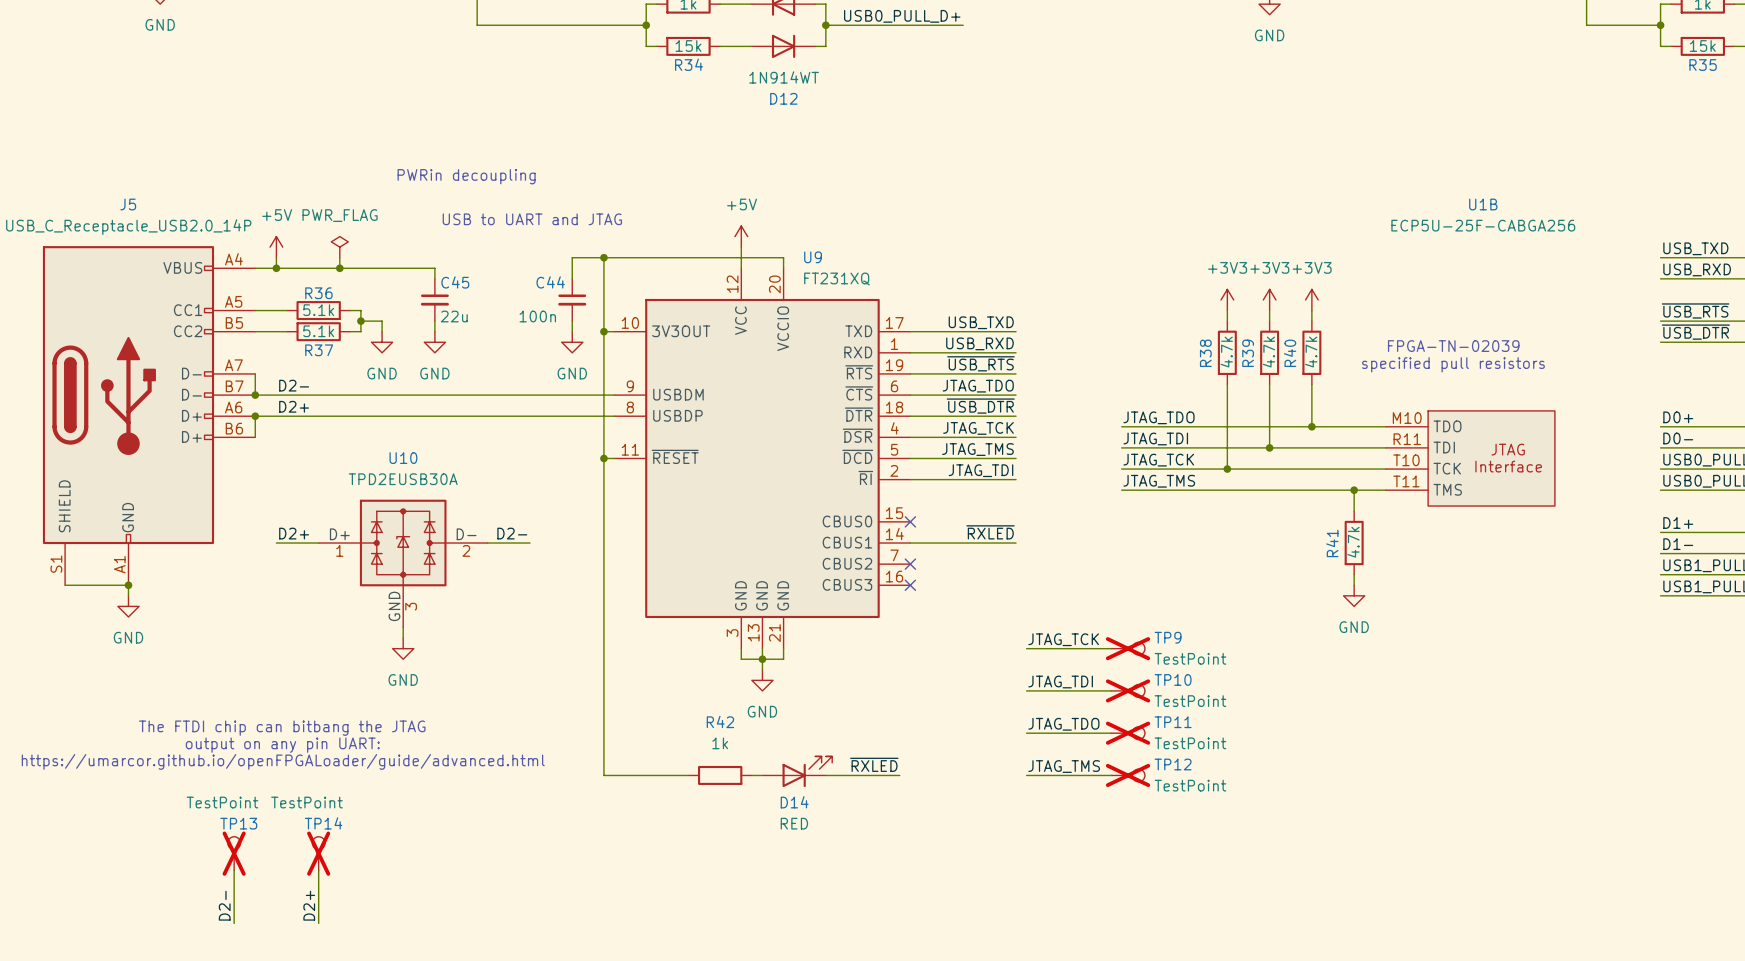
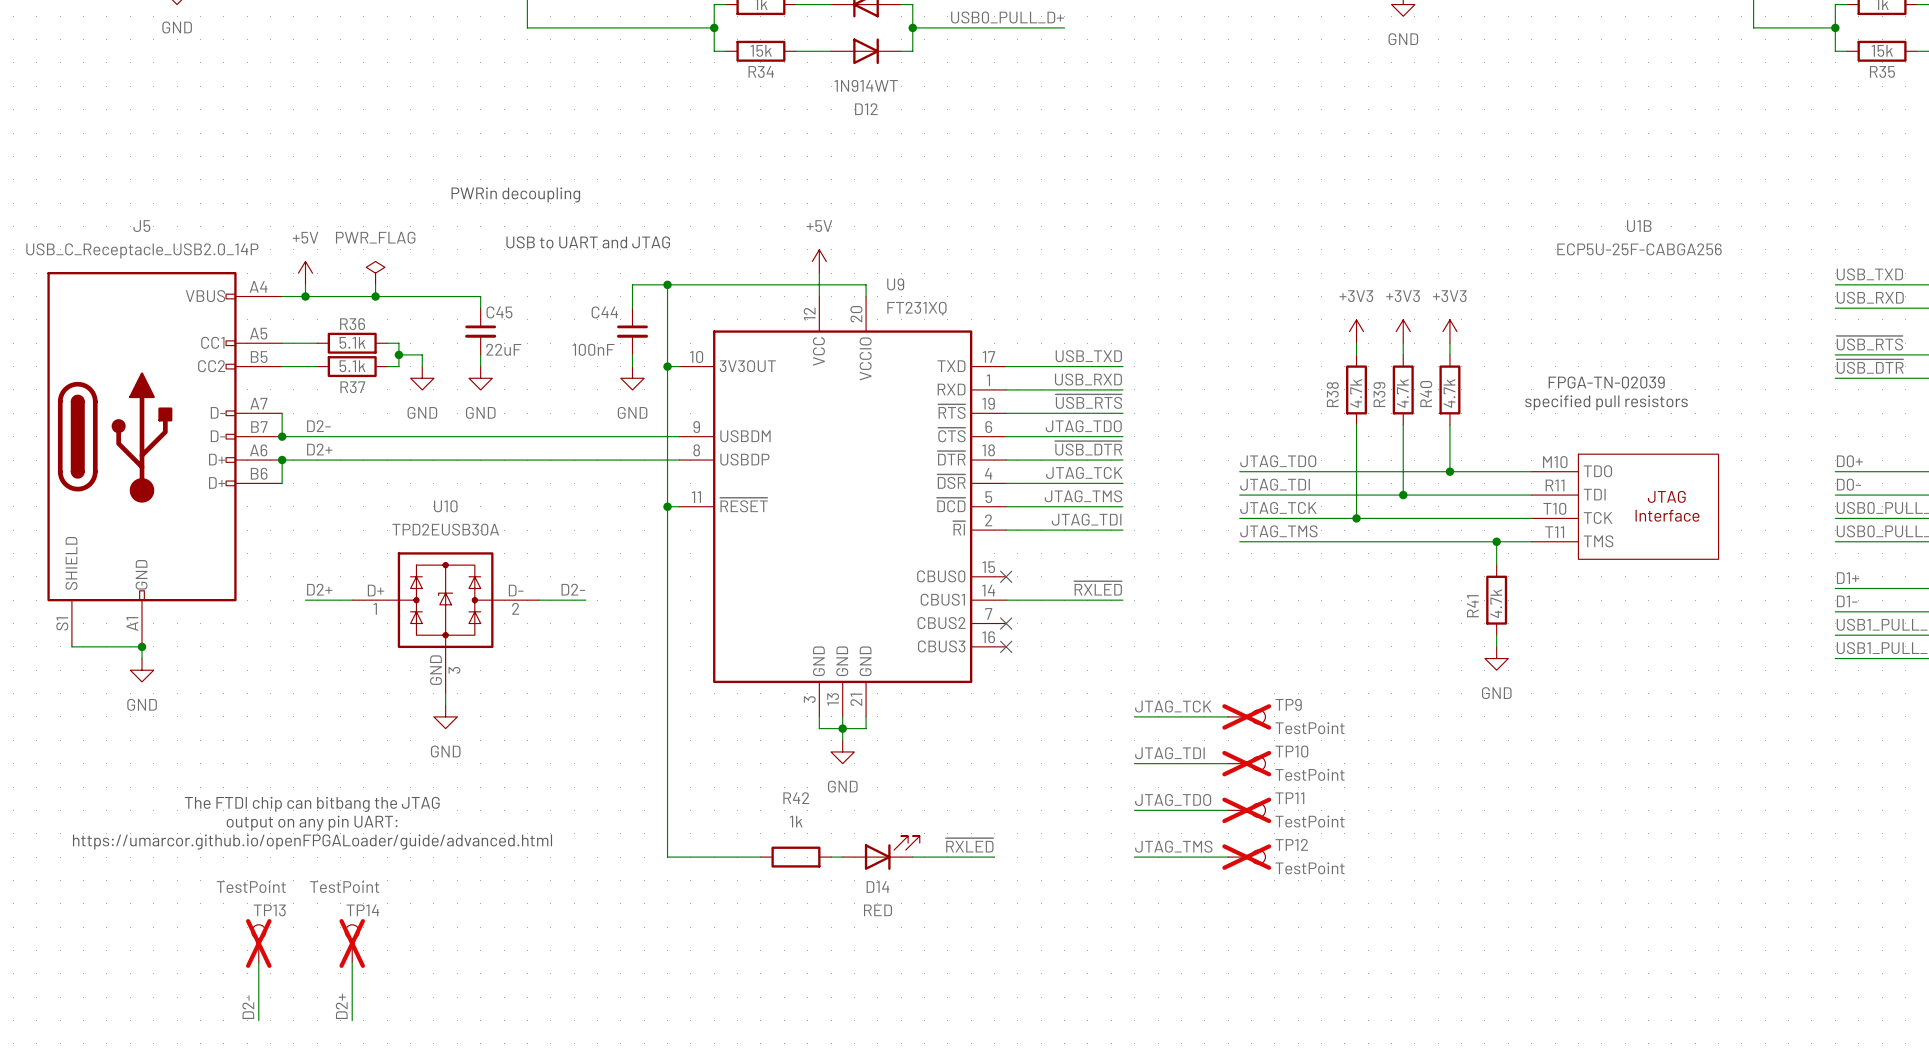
C45 value: 22u (454, 316) -> 22uF (503, 349)
C44 value: 100n (537, 316) -> 100nF (593, 349)

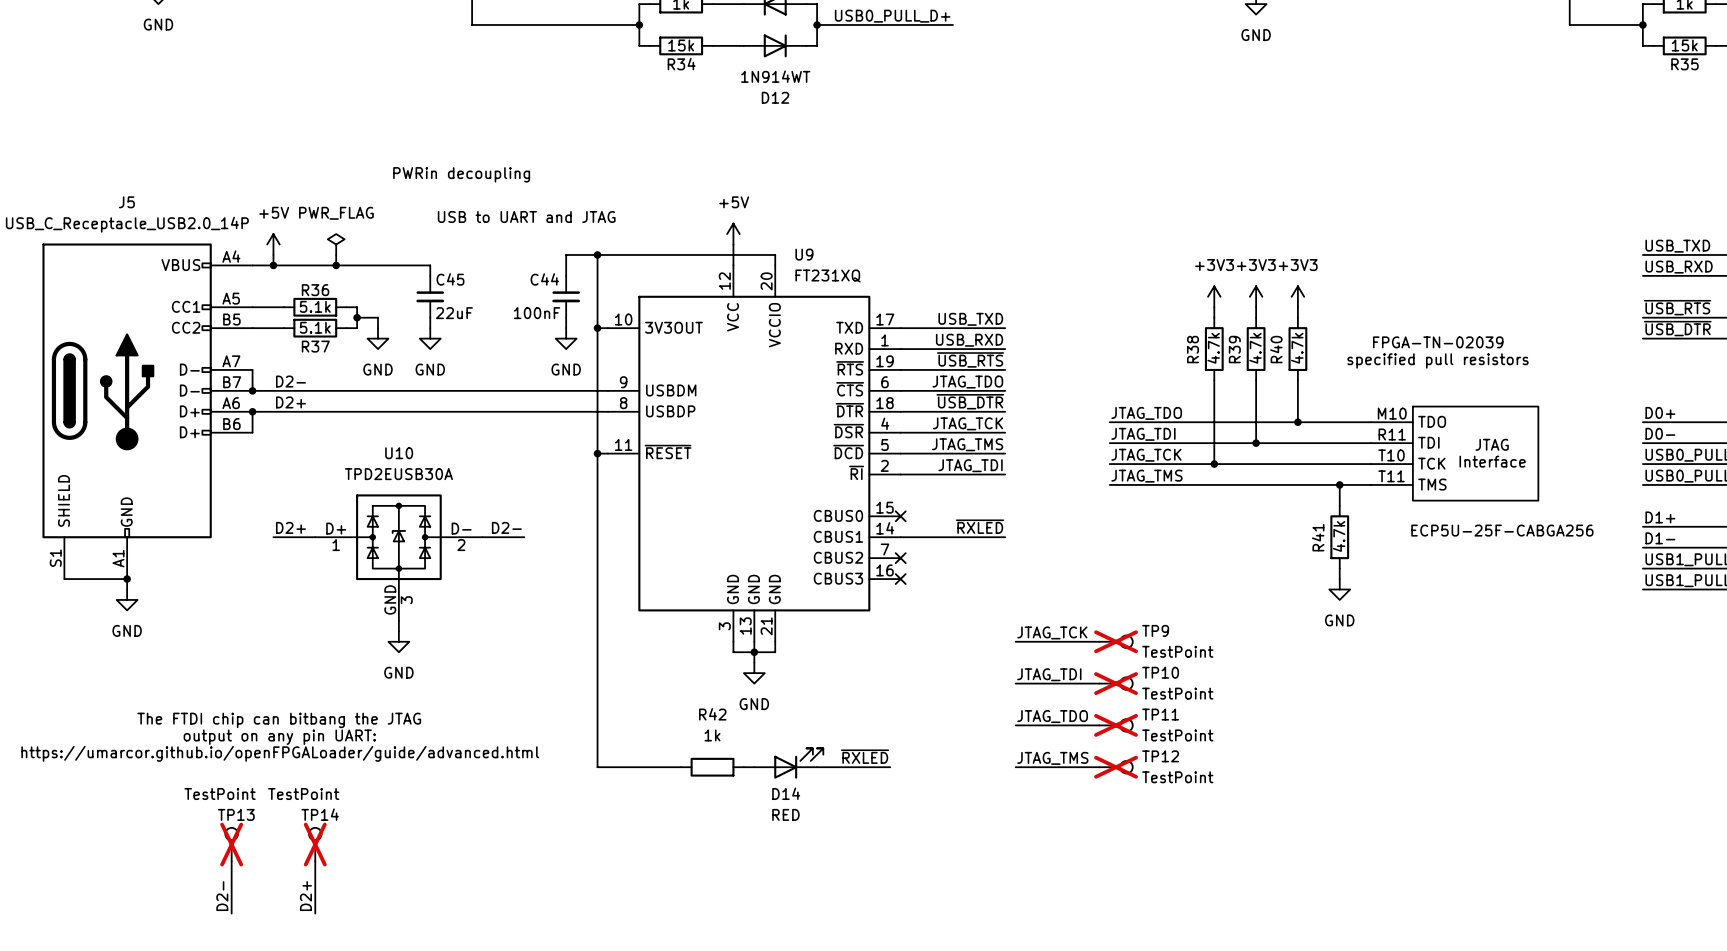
U1B name: U1B (1639, 226) -> none
U1B value position: ECP5U-25F-CABGA256 (1639, 249) -> ECP5U-25F-CABGA256 (1502, 530)

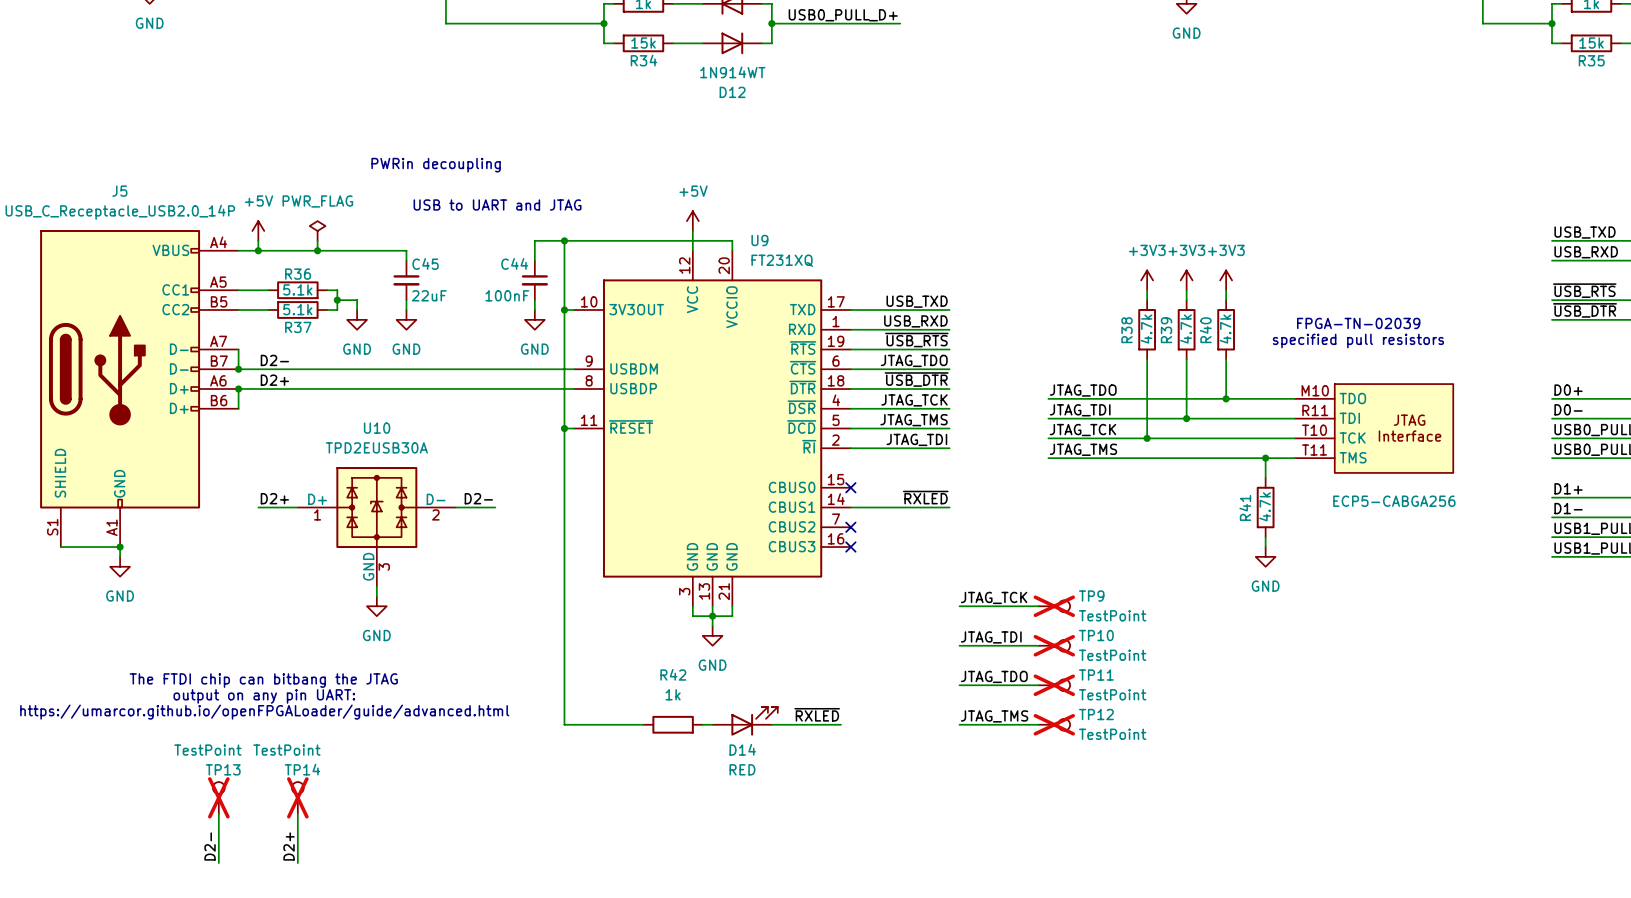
part value: ECP5U-25F-CABGA256 (1502, 530) -> ECP5-CABGA256 (1394, 501)

